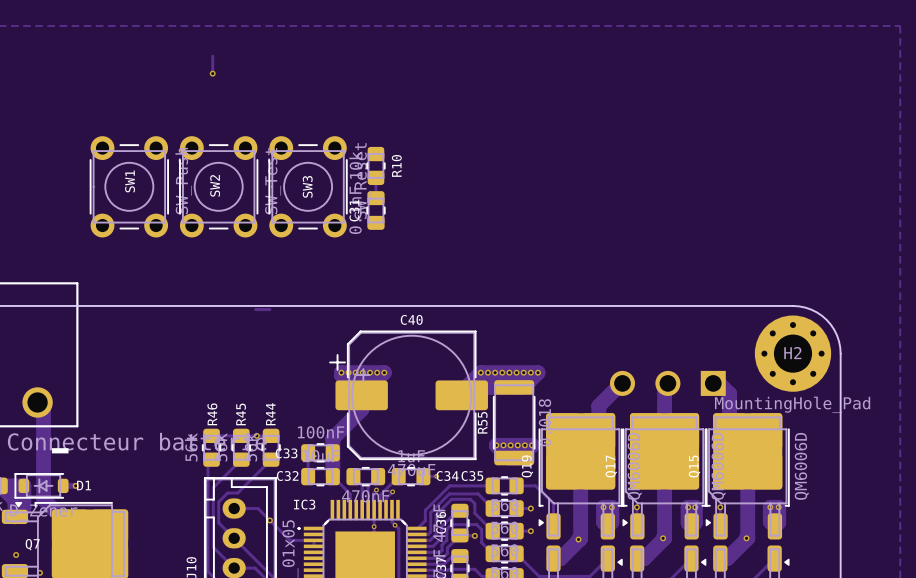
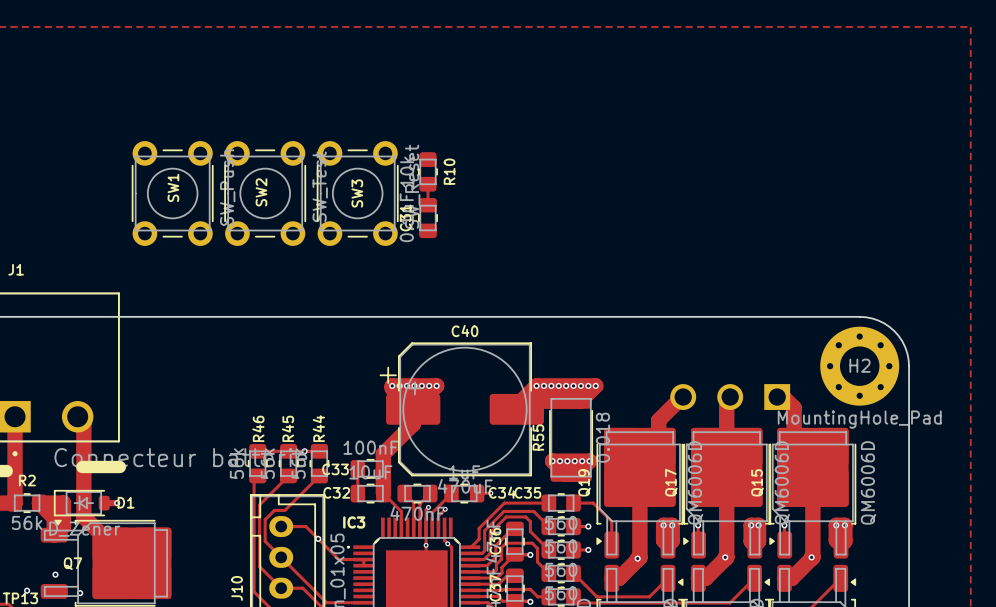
track: (212, 56) (212, 73) -> none
via: (212, 73) -> none
track: (255, 309) (269, 309) -> none

